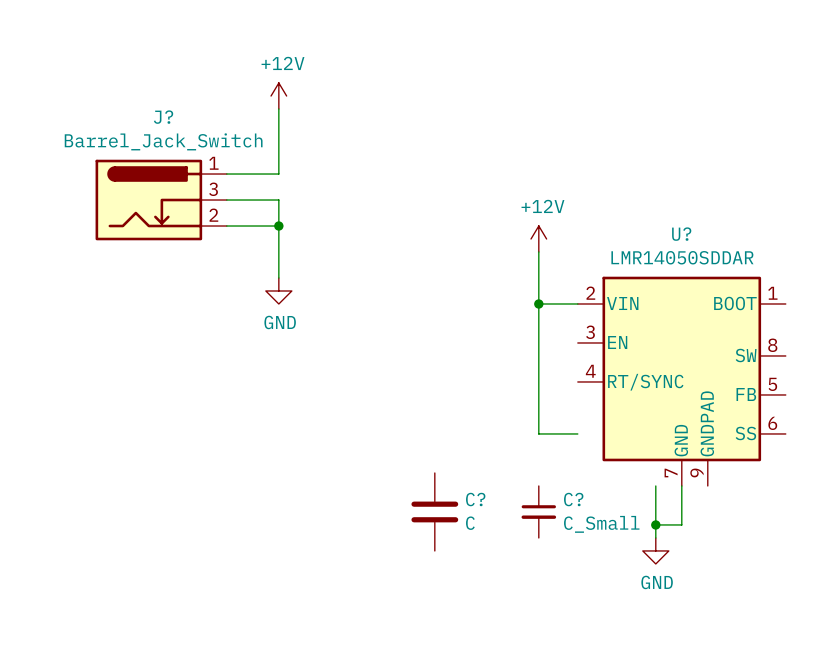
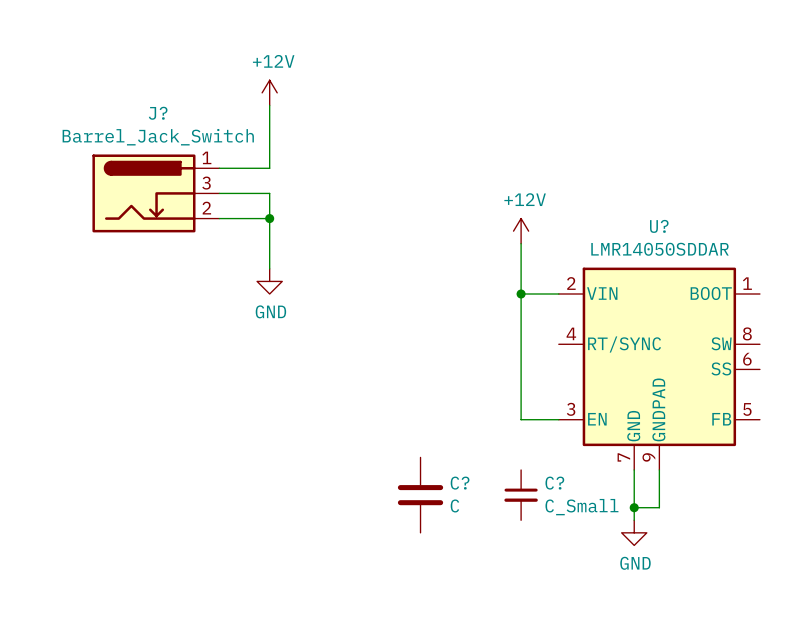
U? symbol: [577, 276, 786, 486] -> [558, 267, 760, 470]

